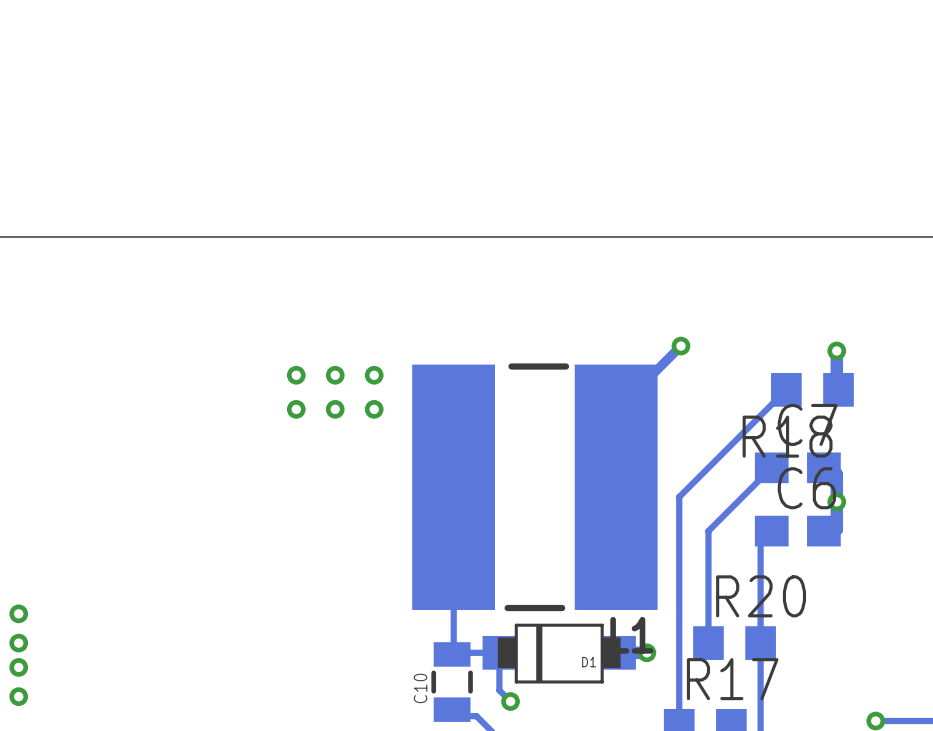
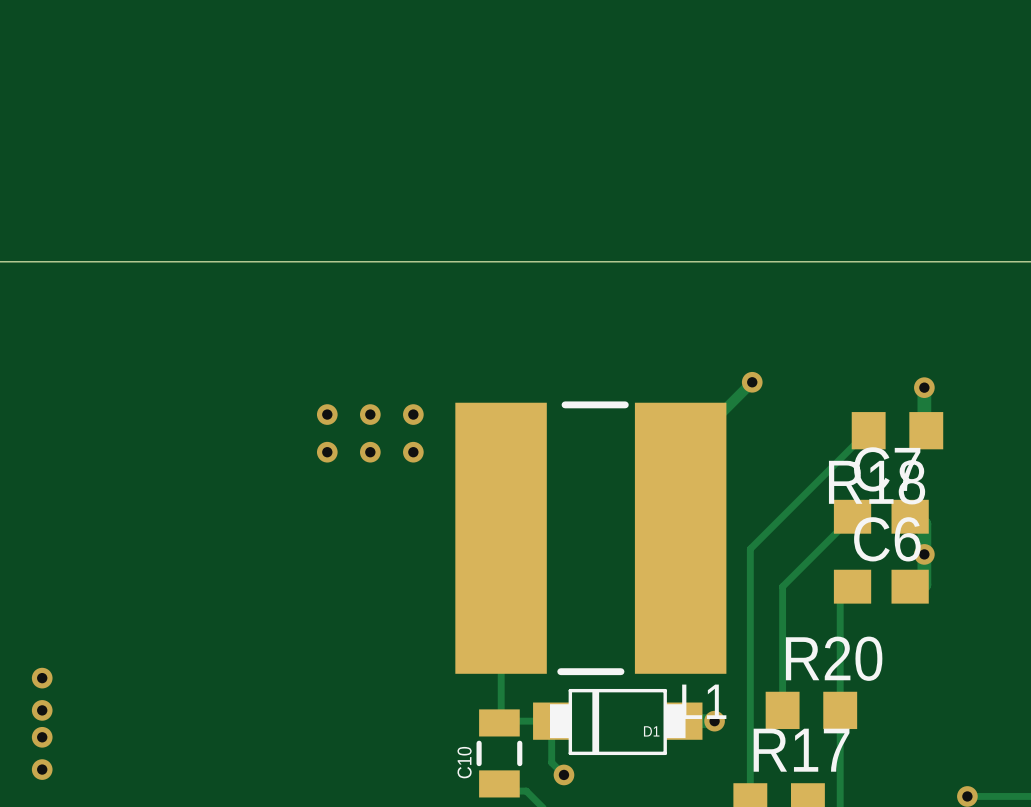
via: (18, 613) -> none
via: none -> (42, 678)
via: (18, 643) -> none
via: none -> (42, 710)
via: (18, 667) -> none
via: none -> (42, 737)
via: (18, 696) -> none
via: none -> (42, 769)

